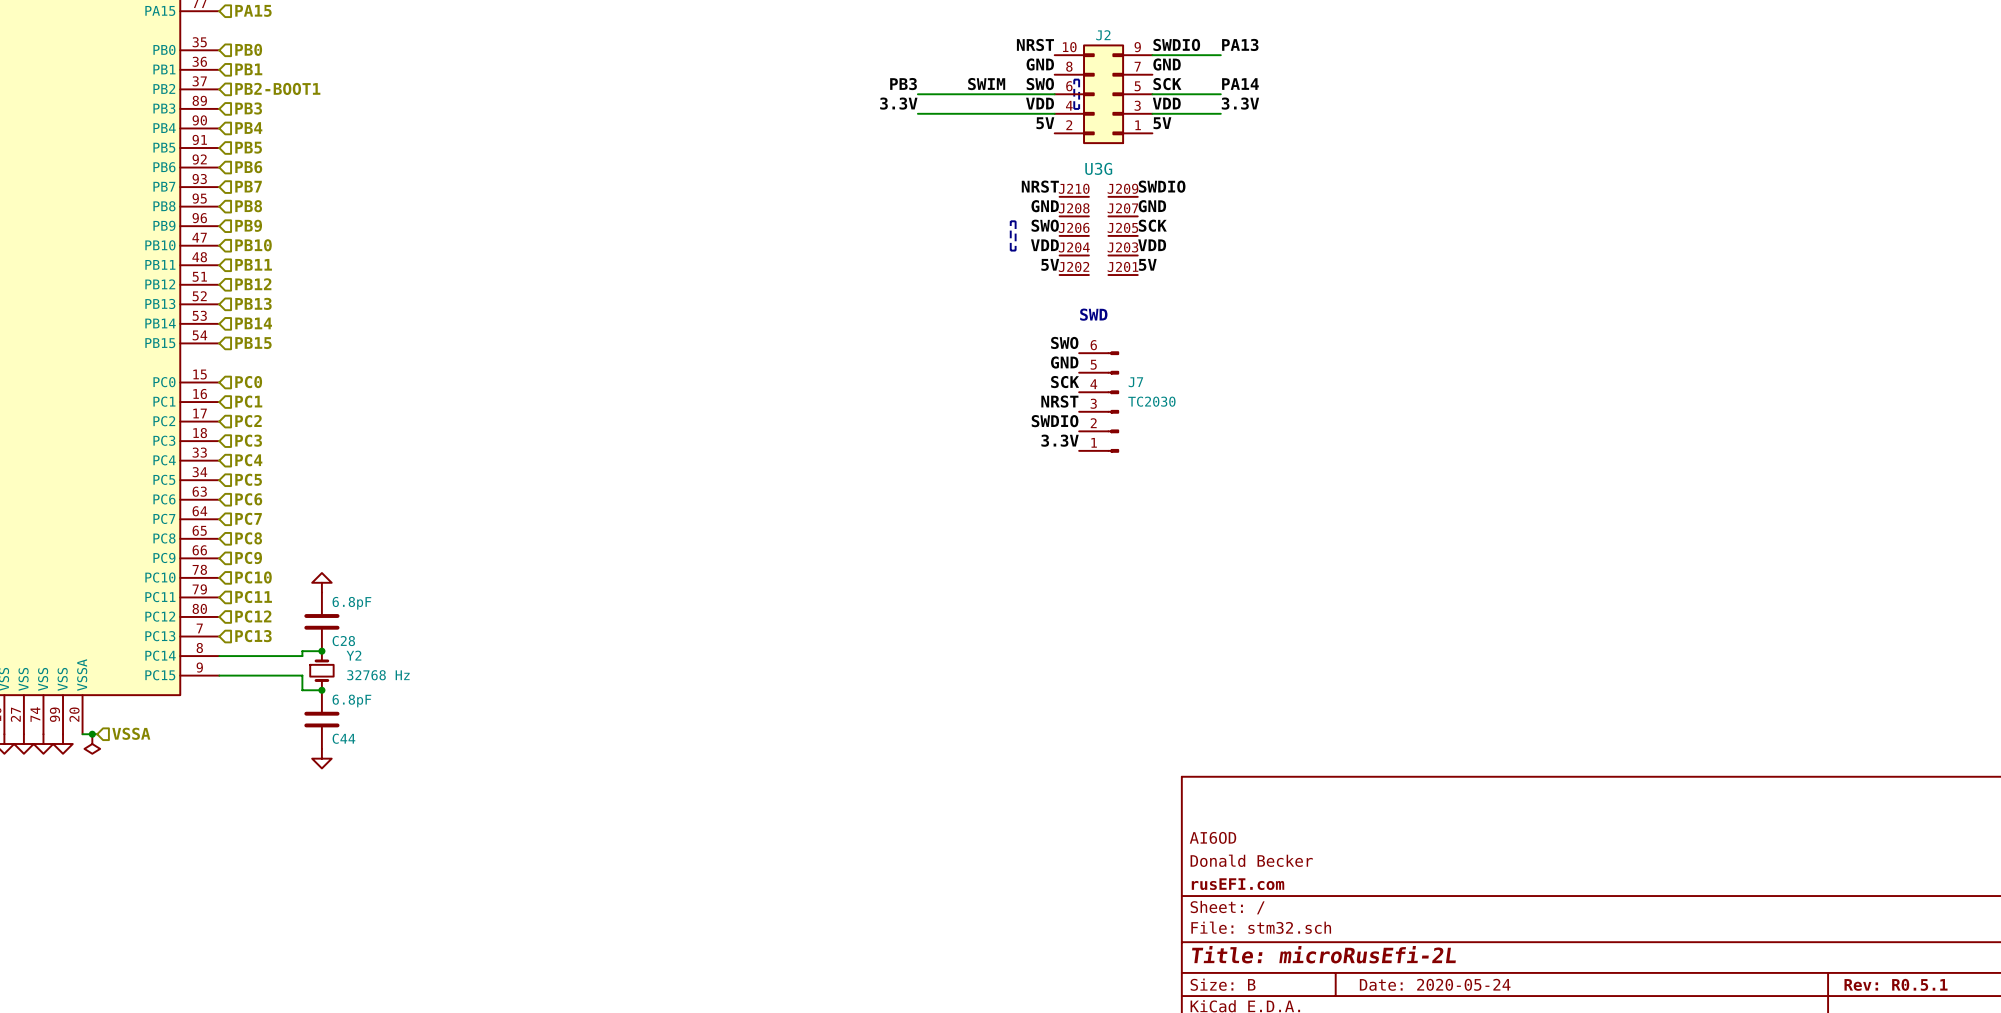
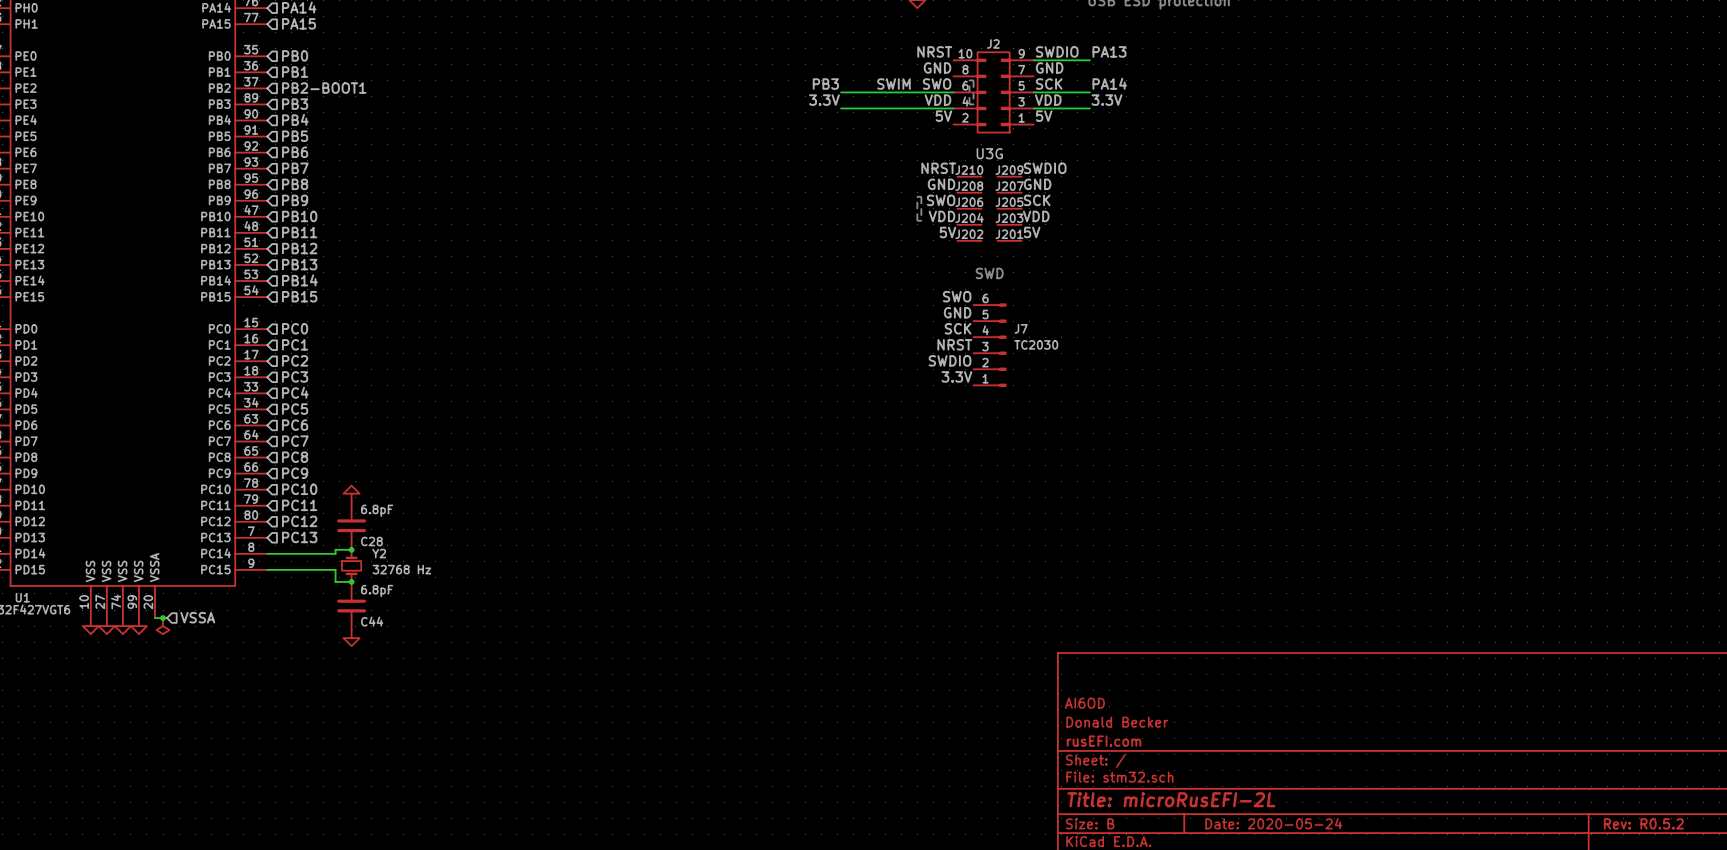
title block: Title: microRusEfi-2L (1323, 954) -> Title: microRusEFI-2L (1171, 799)
title block: Rev: R0.5.1 (1896, 984) -> Rev: R0.5.2 (1643, 823)

